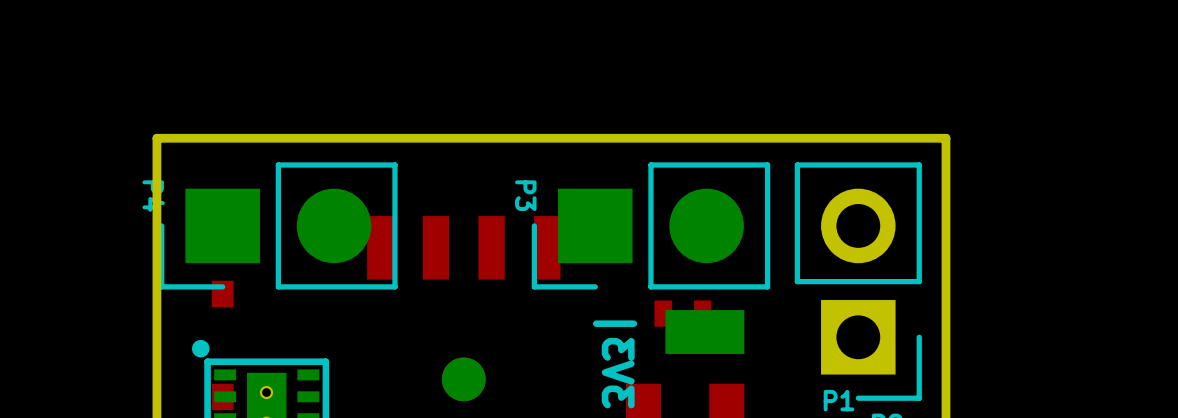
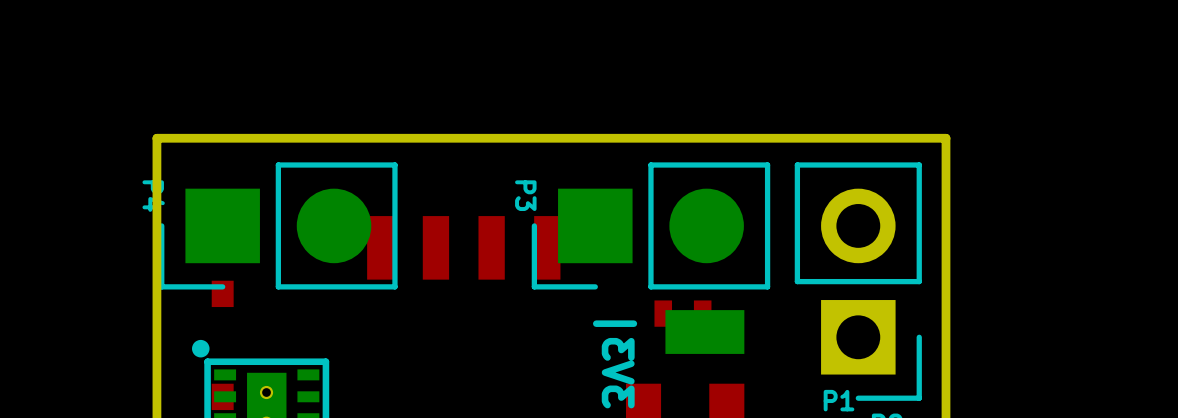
part: (463, 379) -> none

